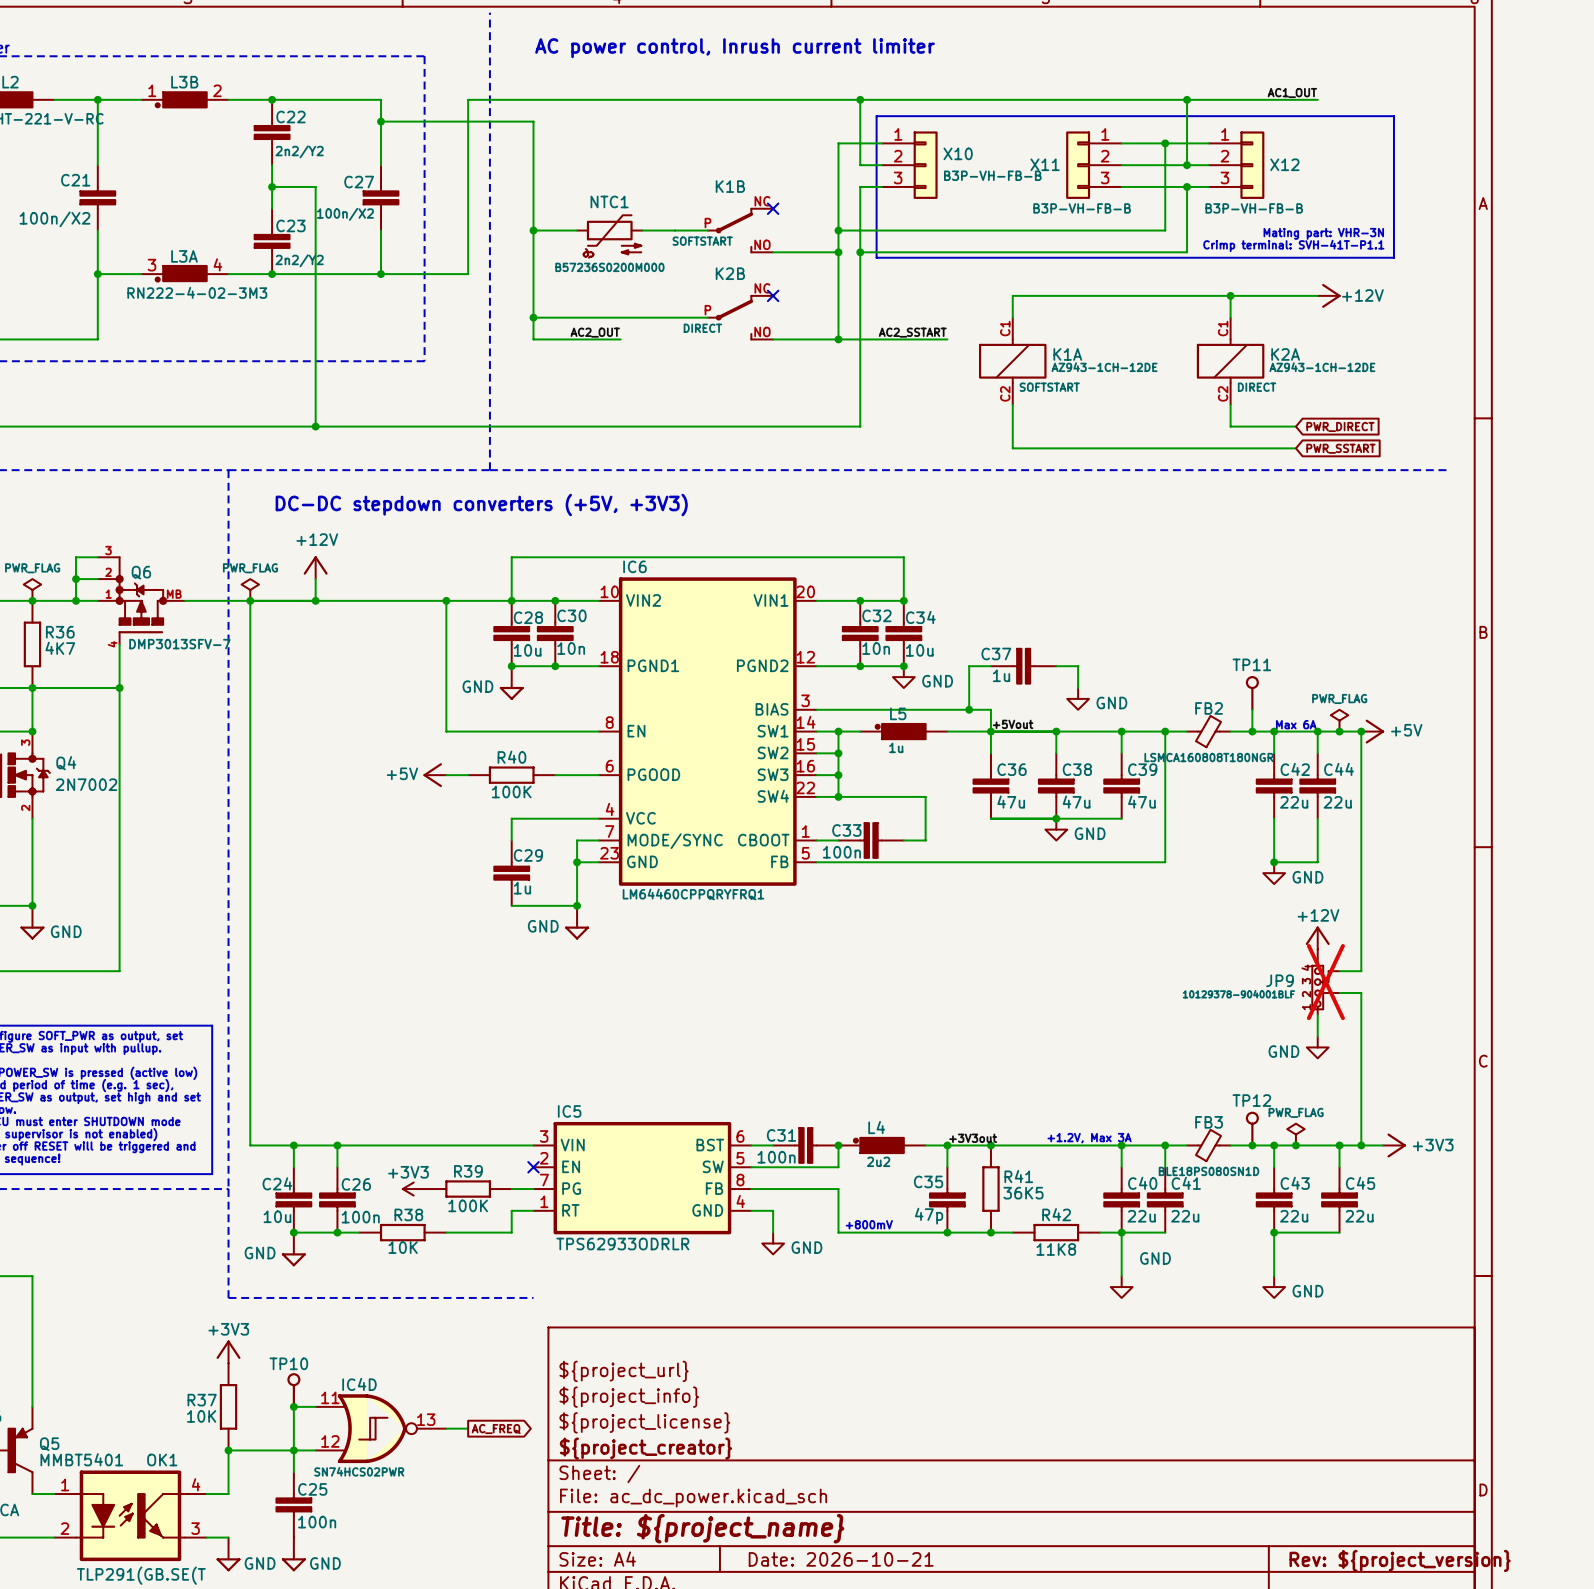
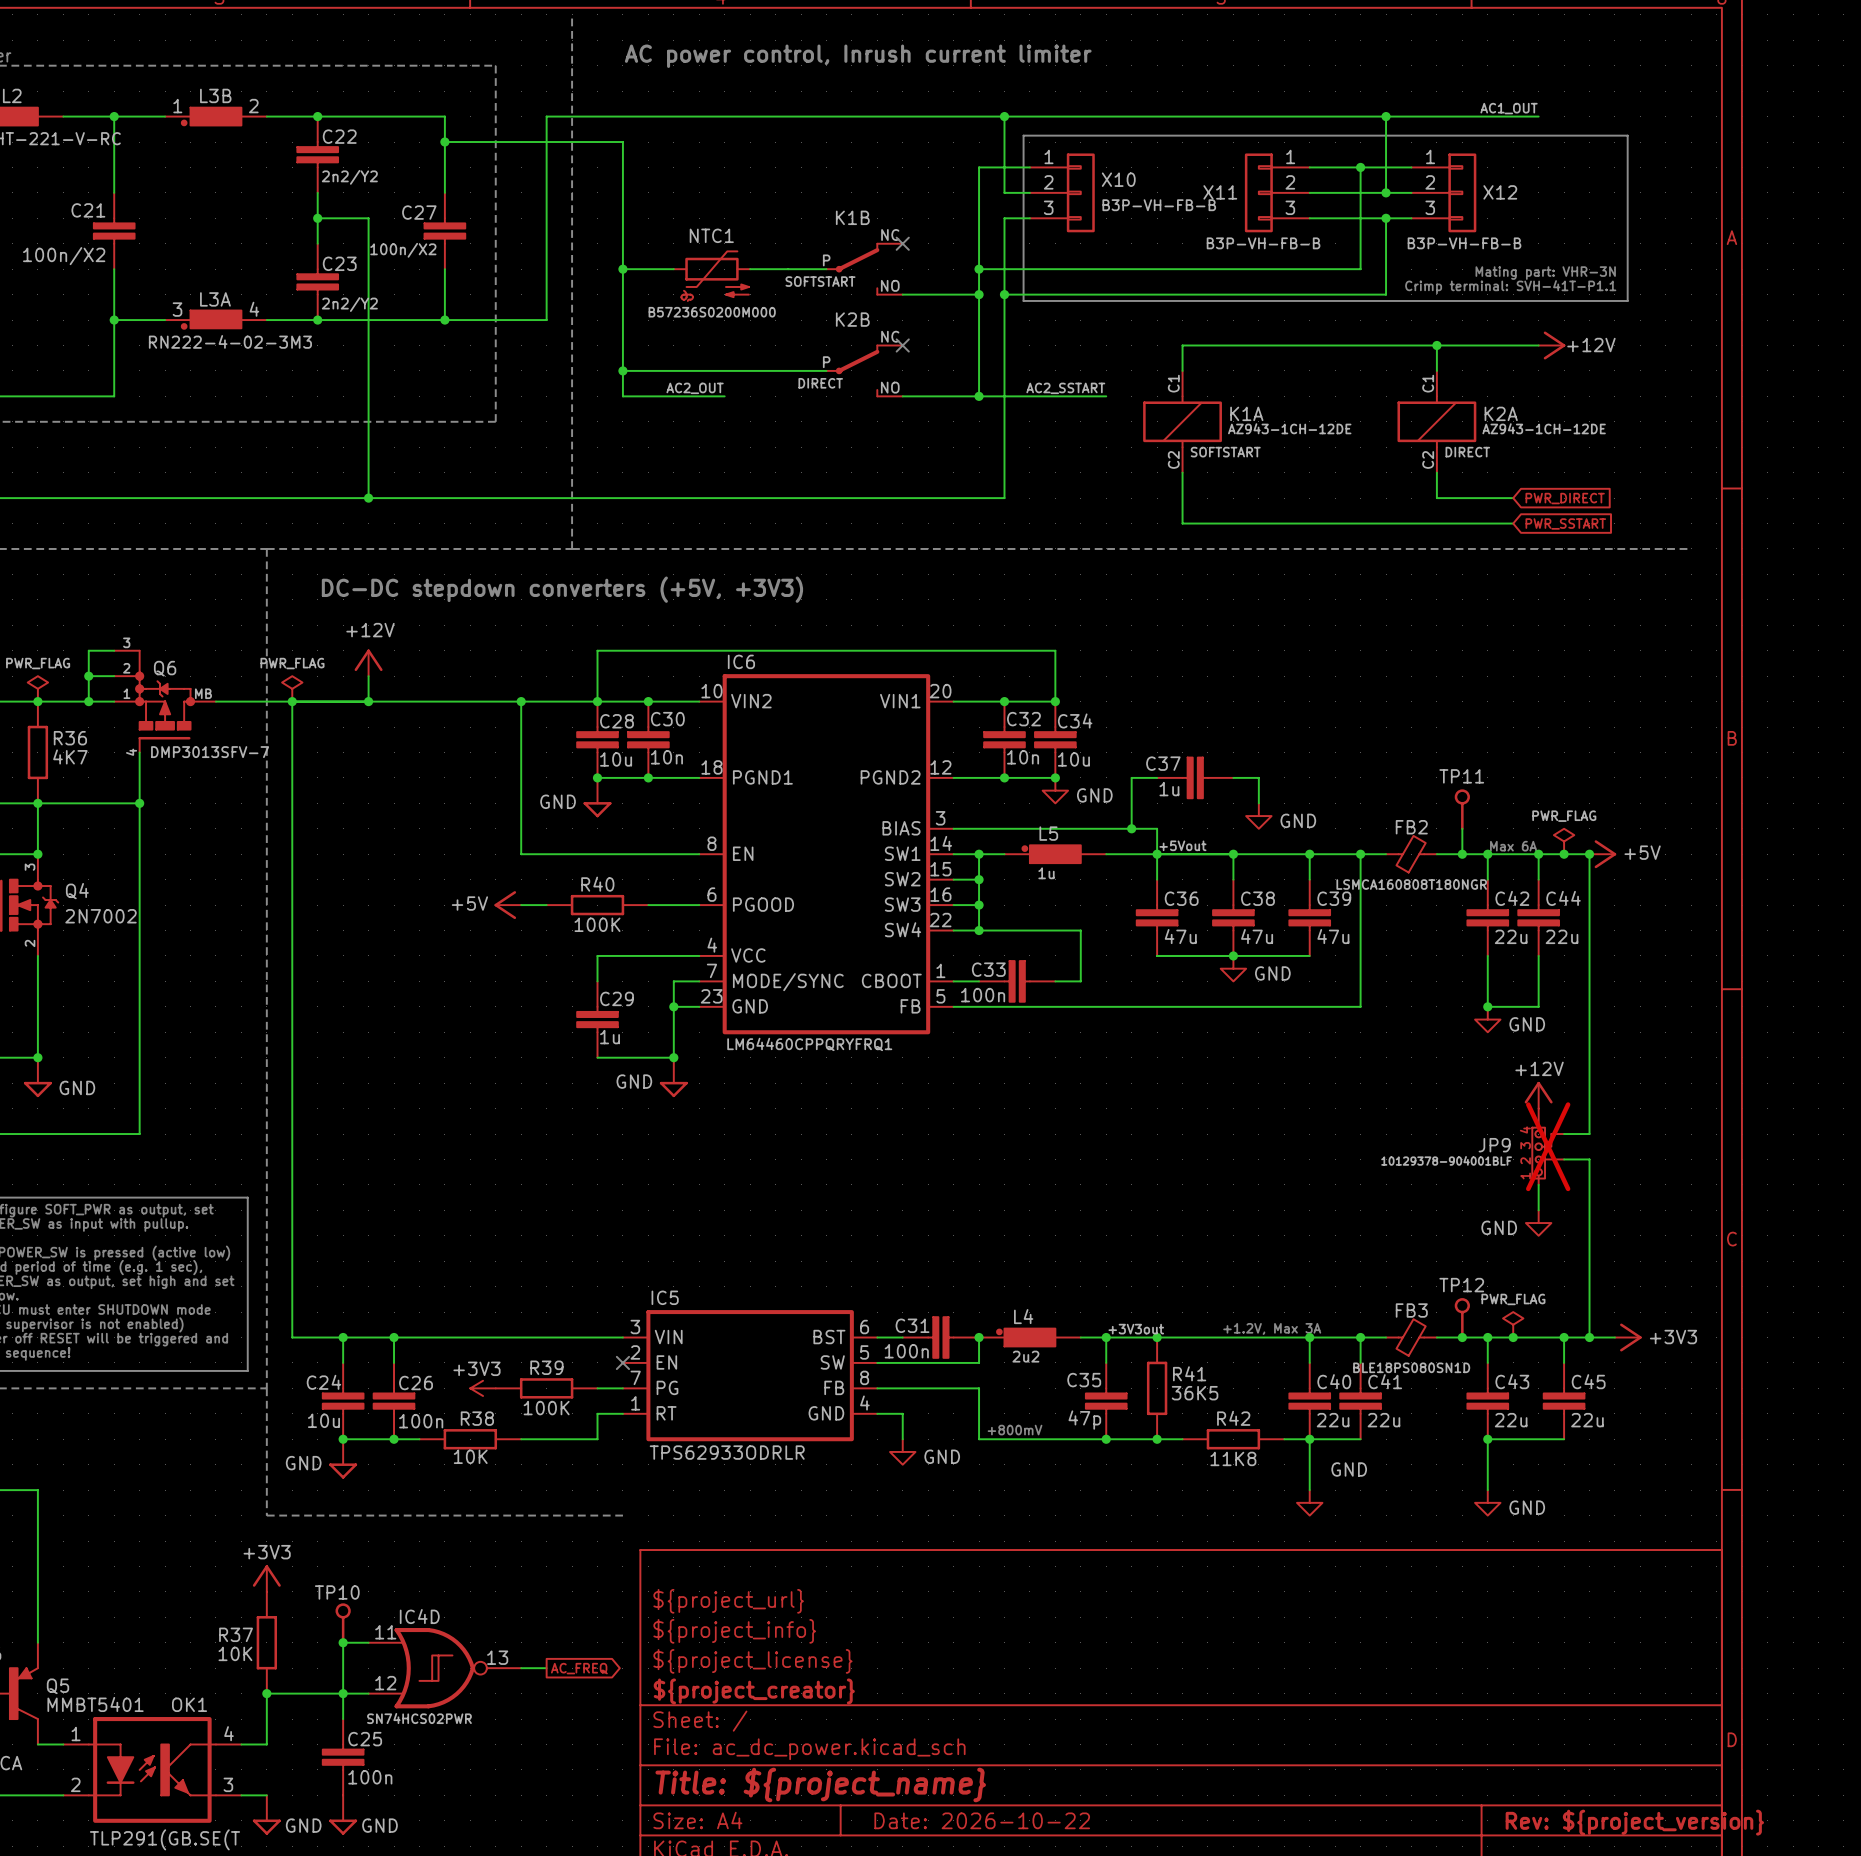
title block: Date: 2026-10-21 (841, 1559) -> Date: 2026-10-22 (982, 1820)

